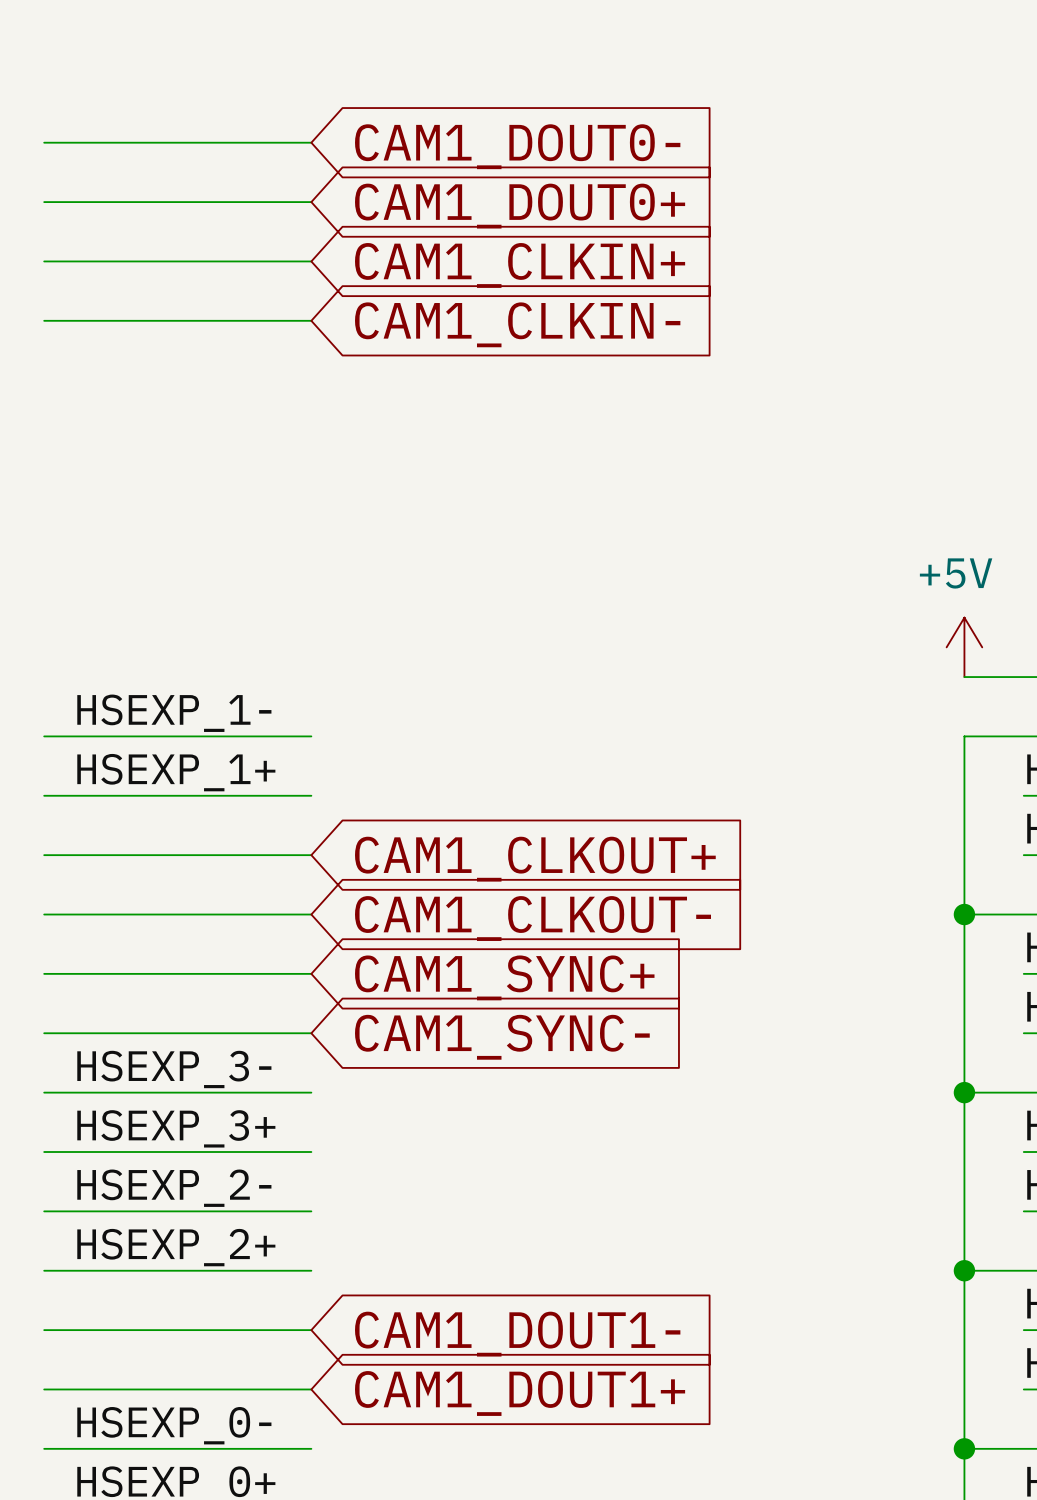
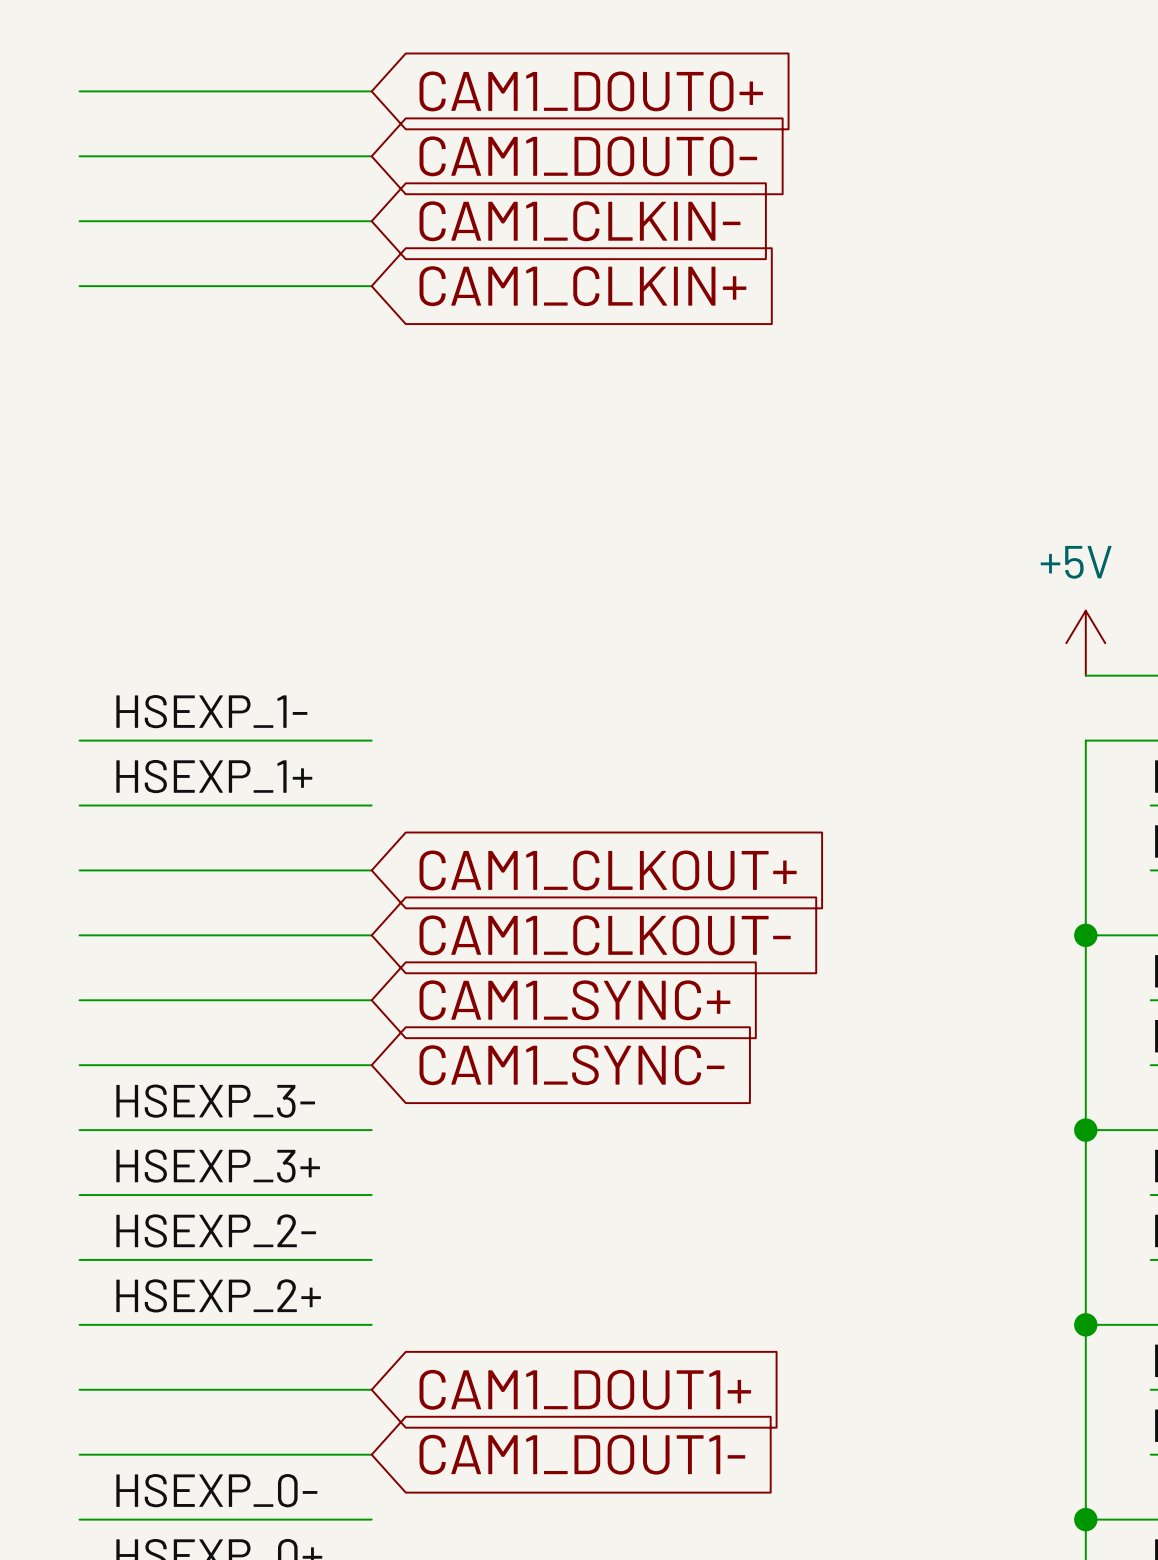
global label: CAM1_DOUT0- (517, 146) -> CAM1_DOUT0+ (591, 91)
global label: CAM1_DOUT0+ (520, 206) -> CAM1_DOUT0- (588, 156)
global label: CAM1_CLKIN+ (520, 265) -> CAM1_CLKIN- (579, 221)
global label: CAM1_CLKIN- (517, 324) -> CAM1_CLKIN+ (582, 286)
global label: CAM1_DOUT1- (517, 1334) -> CAM1_DOUT1+ (585, 1389)
global label: CAM1_DOUT1+ (520, 1393) -> CAM1_DOUT1- (582, 1454)

